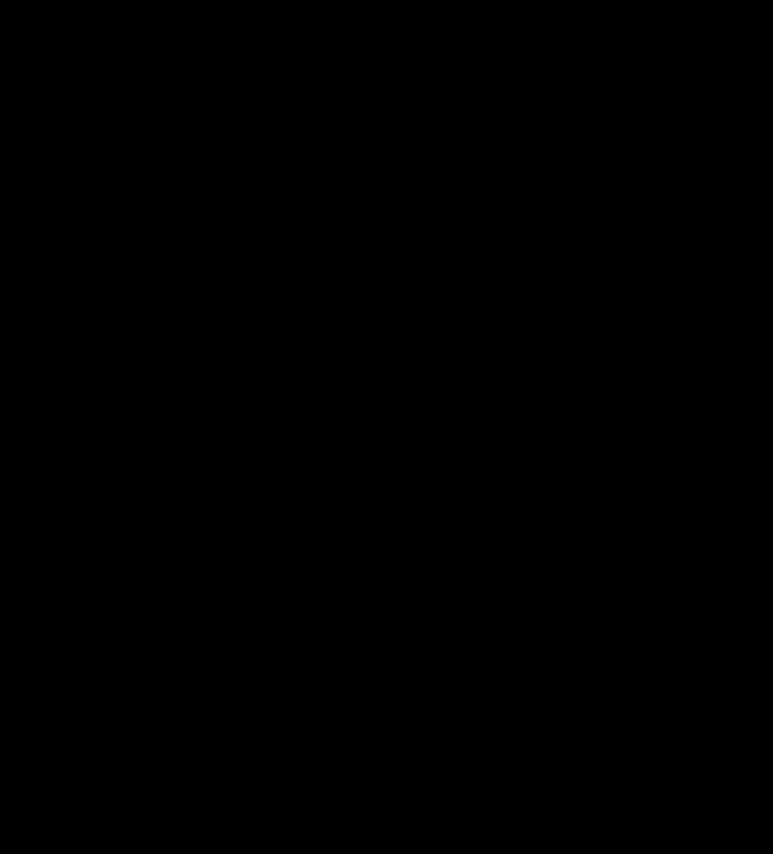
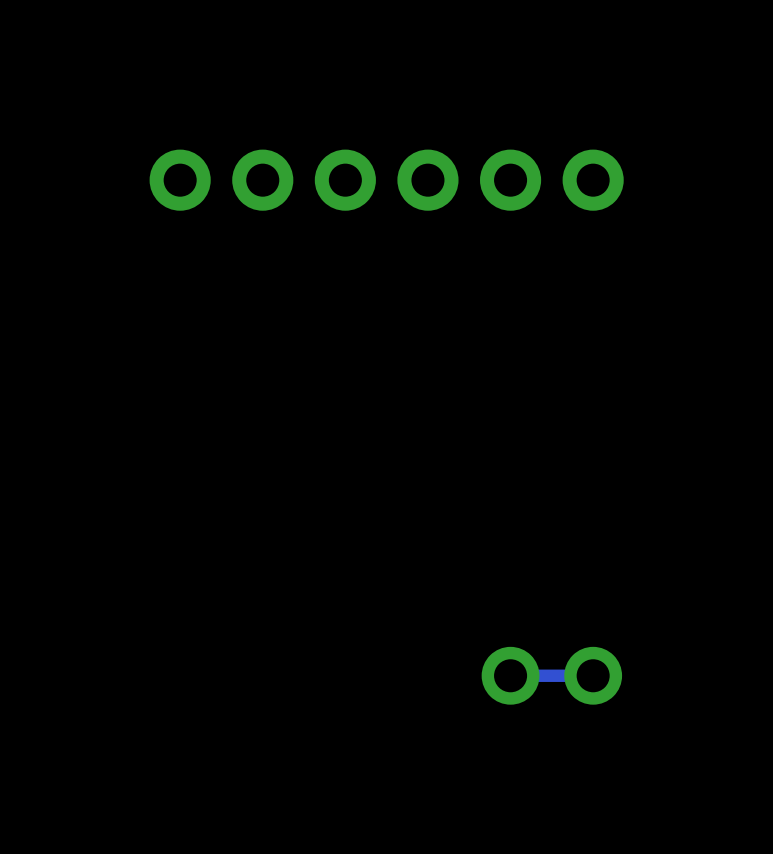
part: none -> (386, 180)
part: none -> (551, 675)

